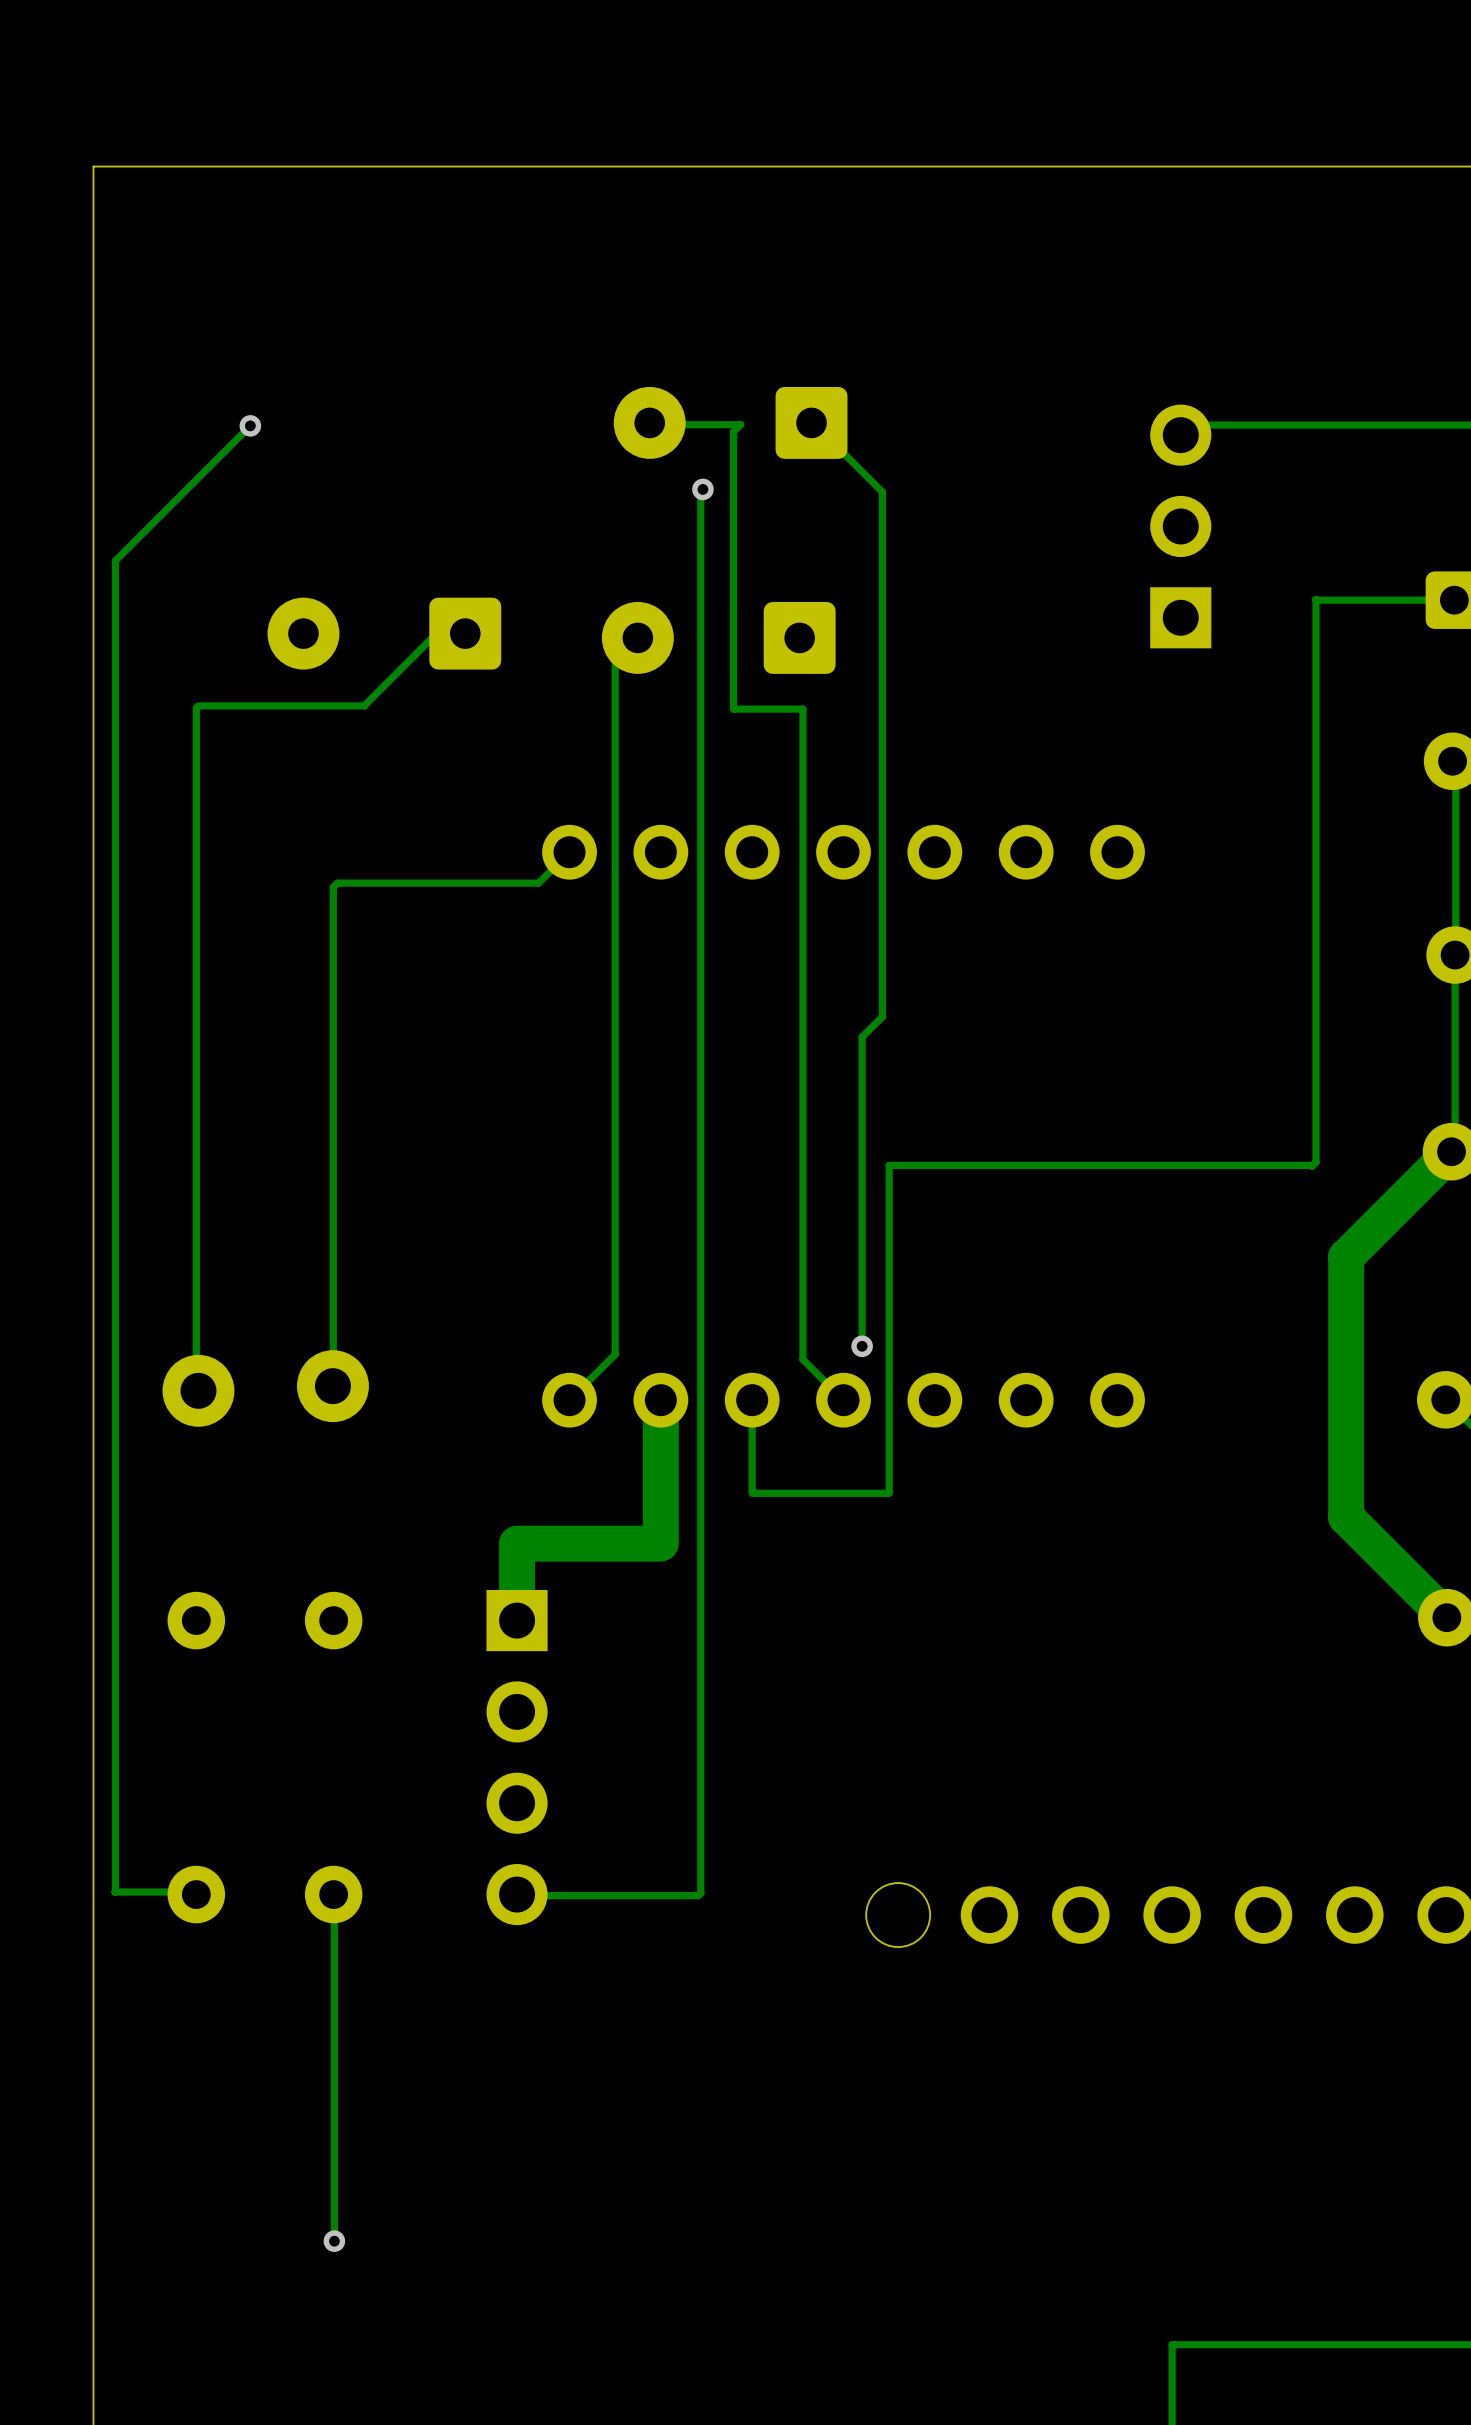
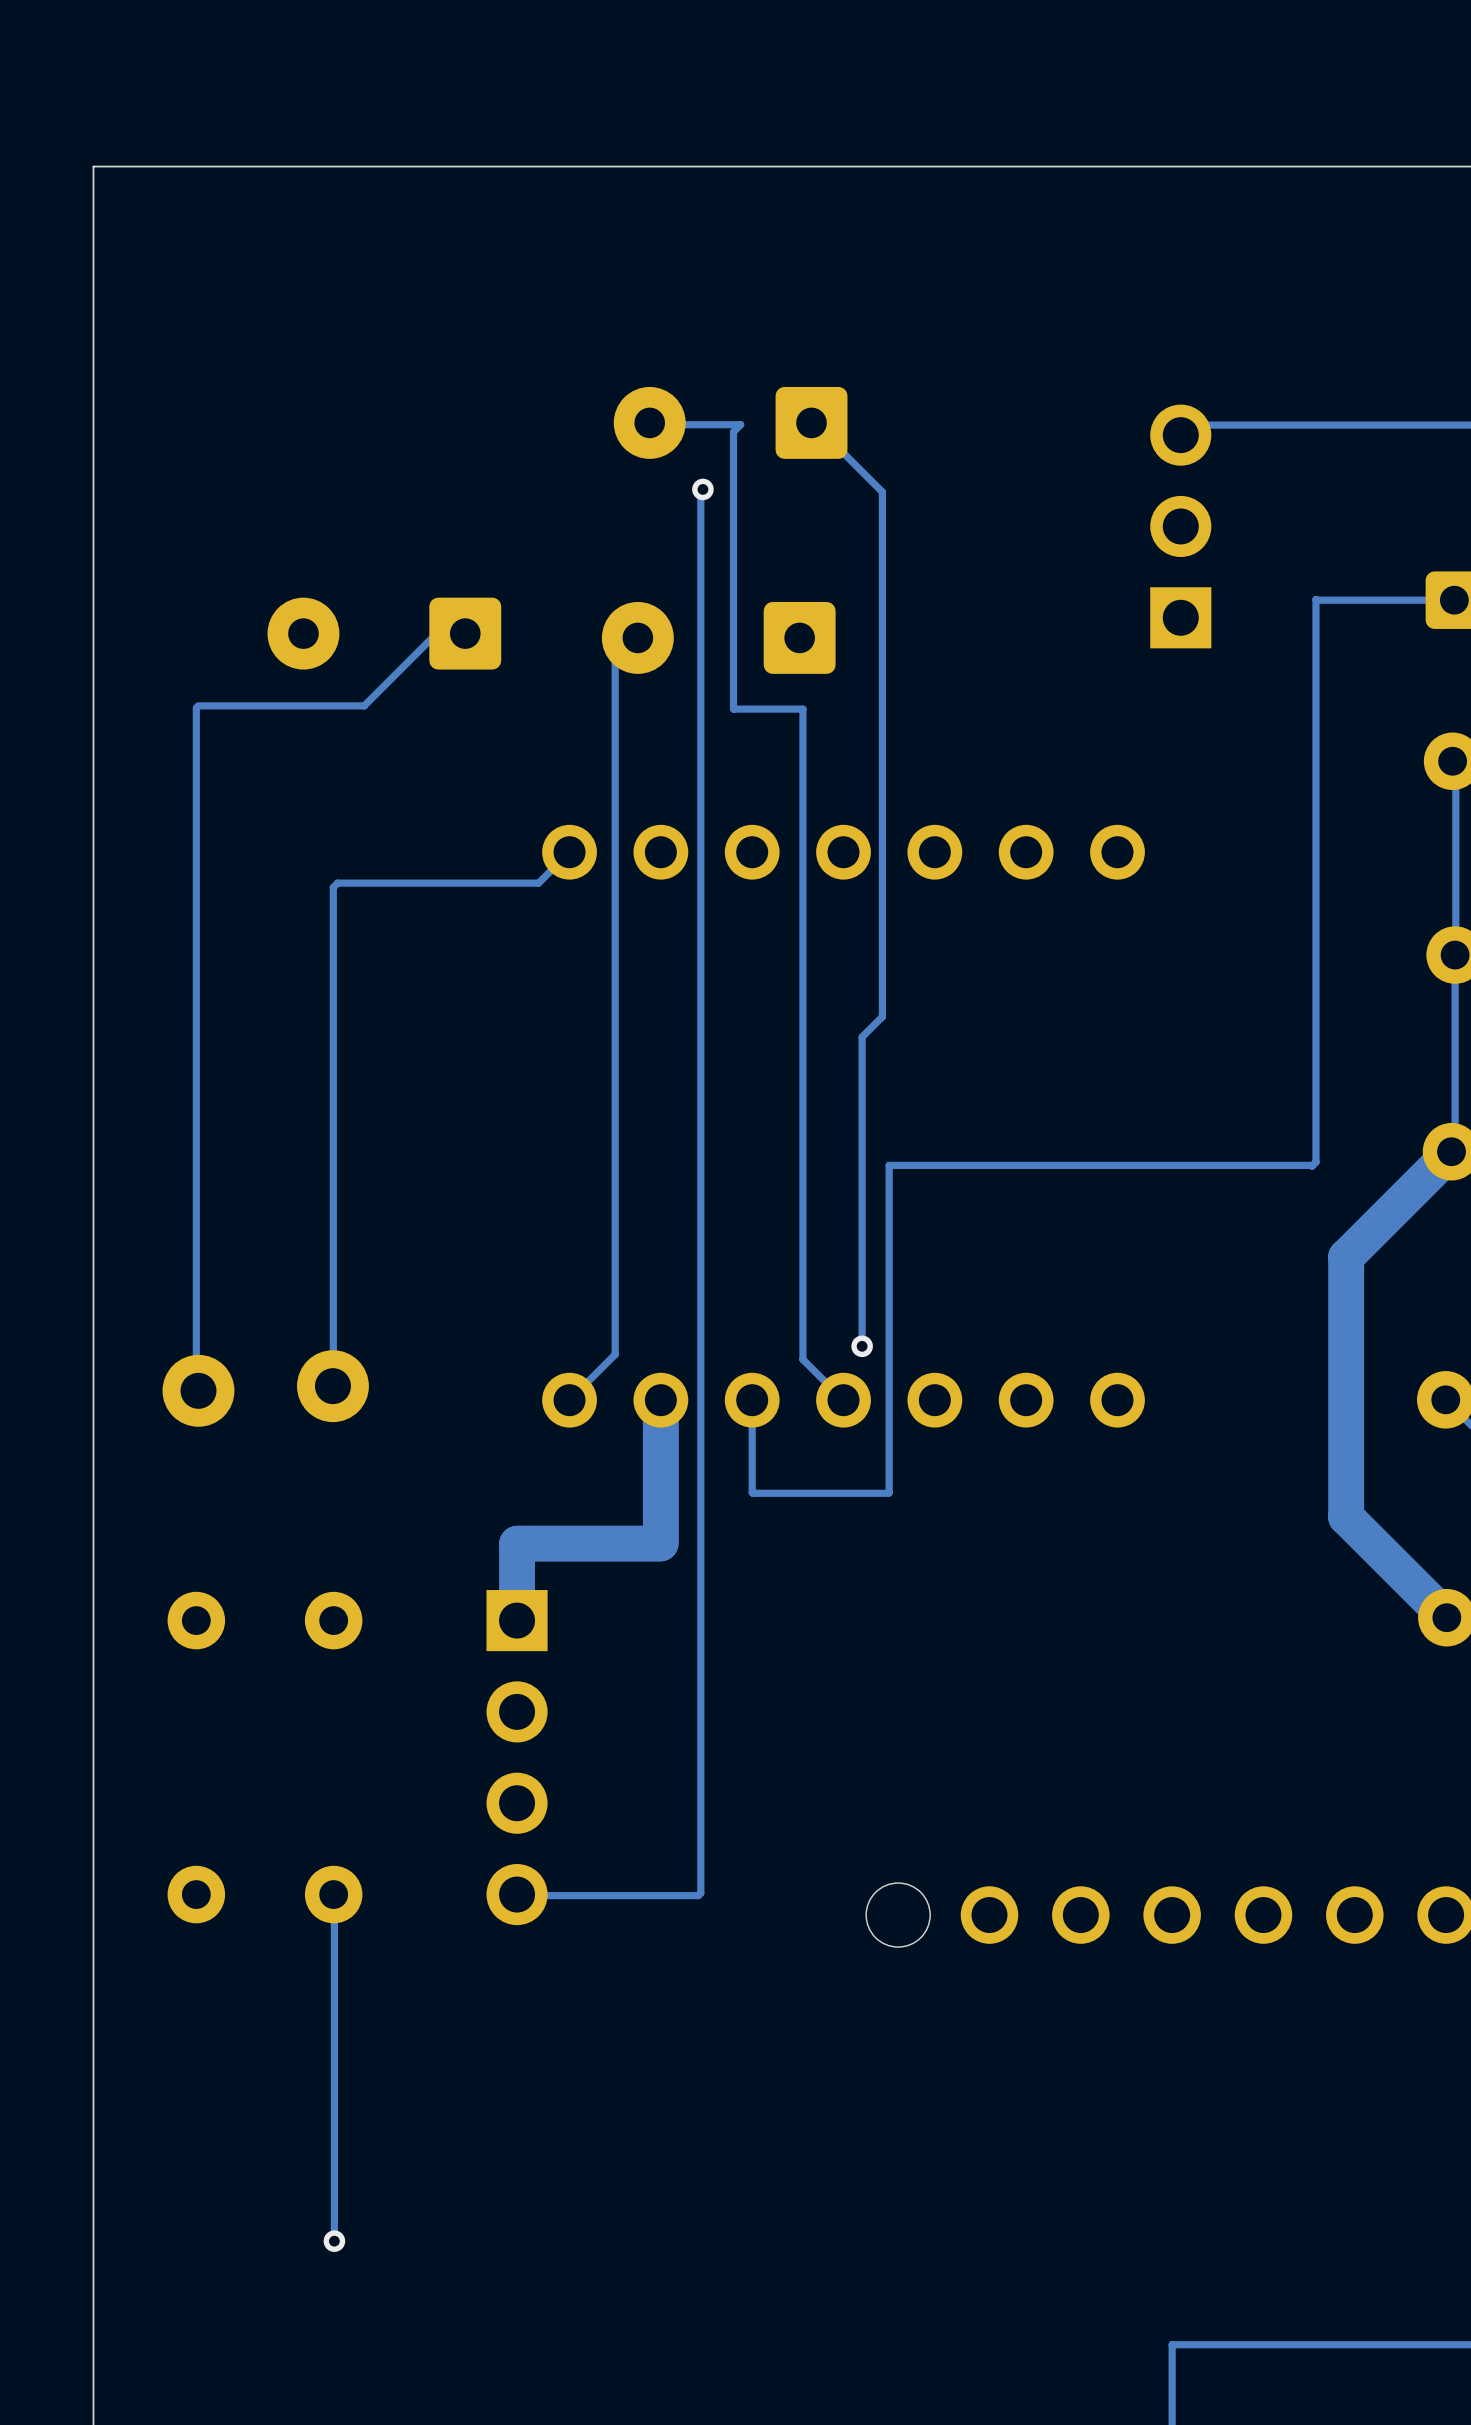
track: (250, 425) (115, 560) (115, 1891) -> none
via: (250, 425) -> none
track: (193, 1892) (115, 1892) -> none

